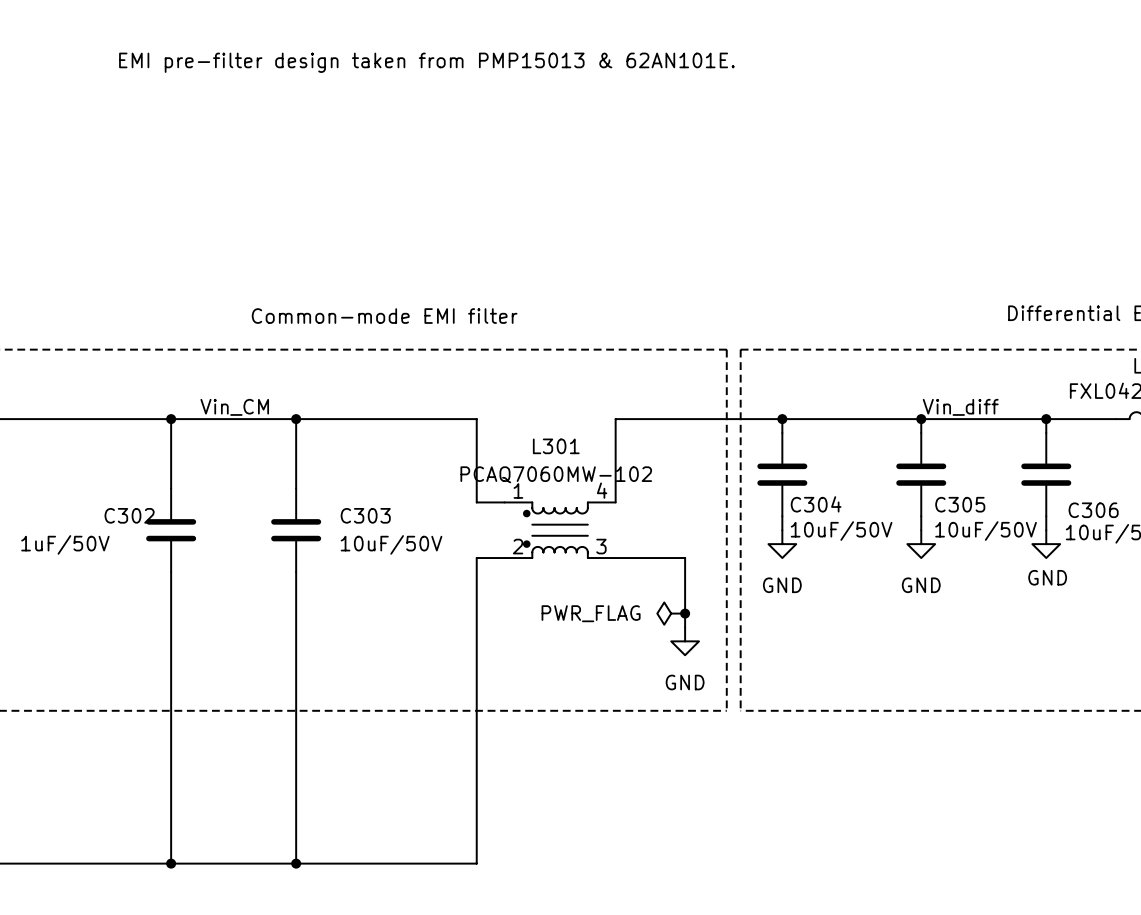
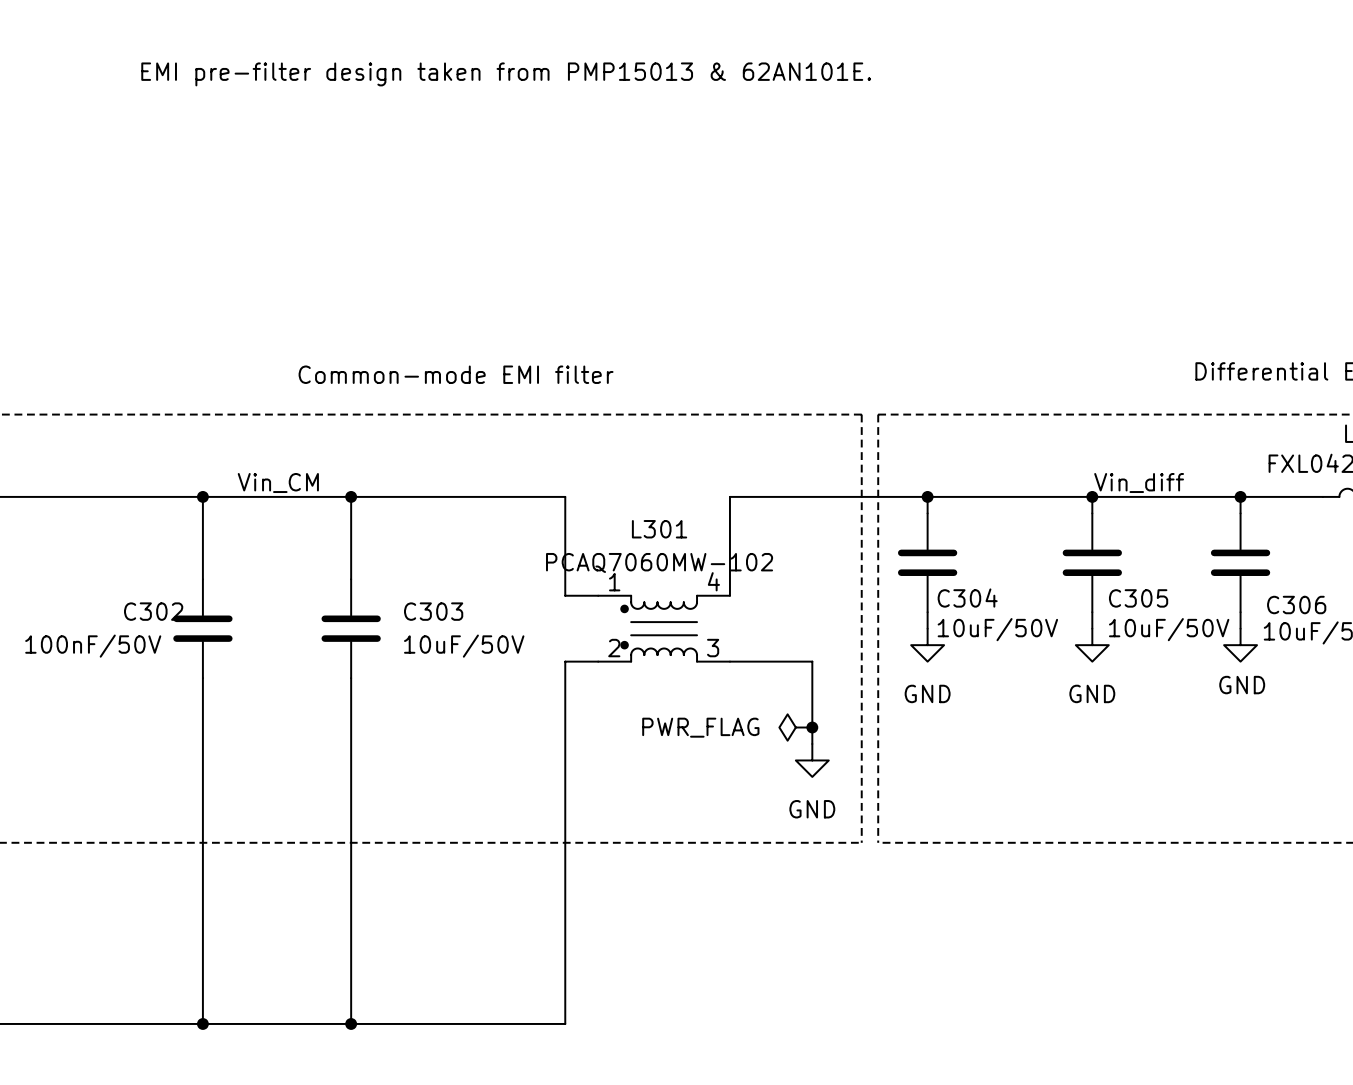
C302 value: 1uF/50V (65, 544) -> 100nF/50V (93, 646)

